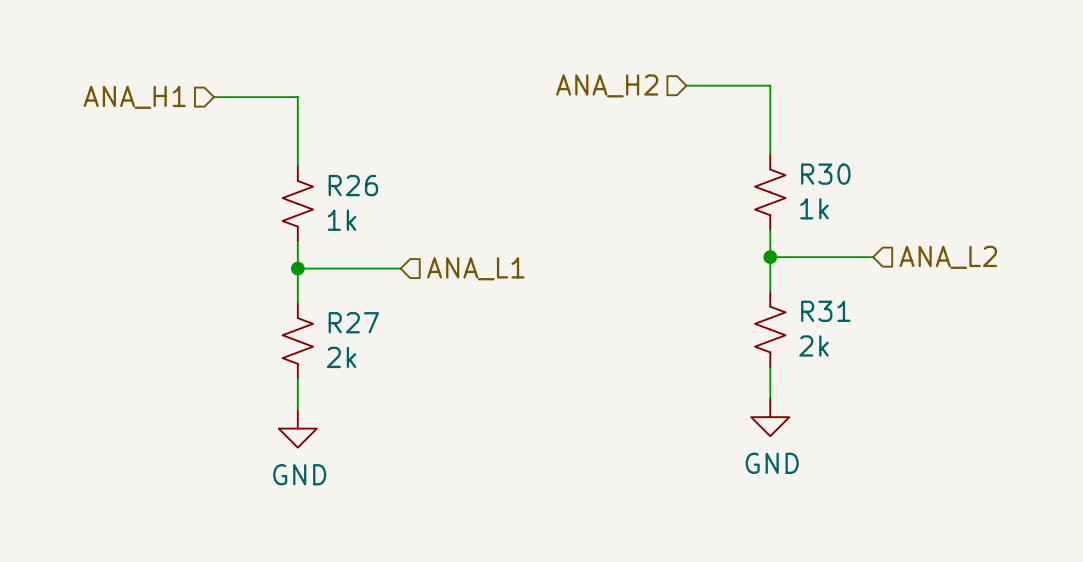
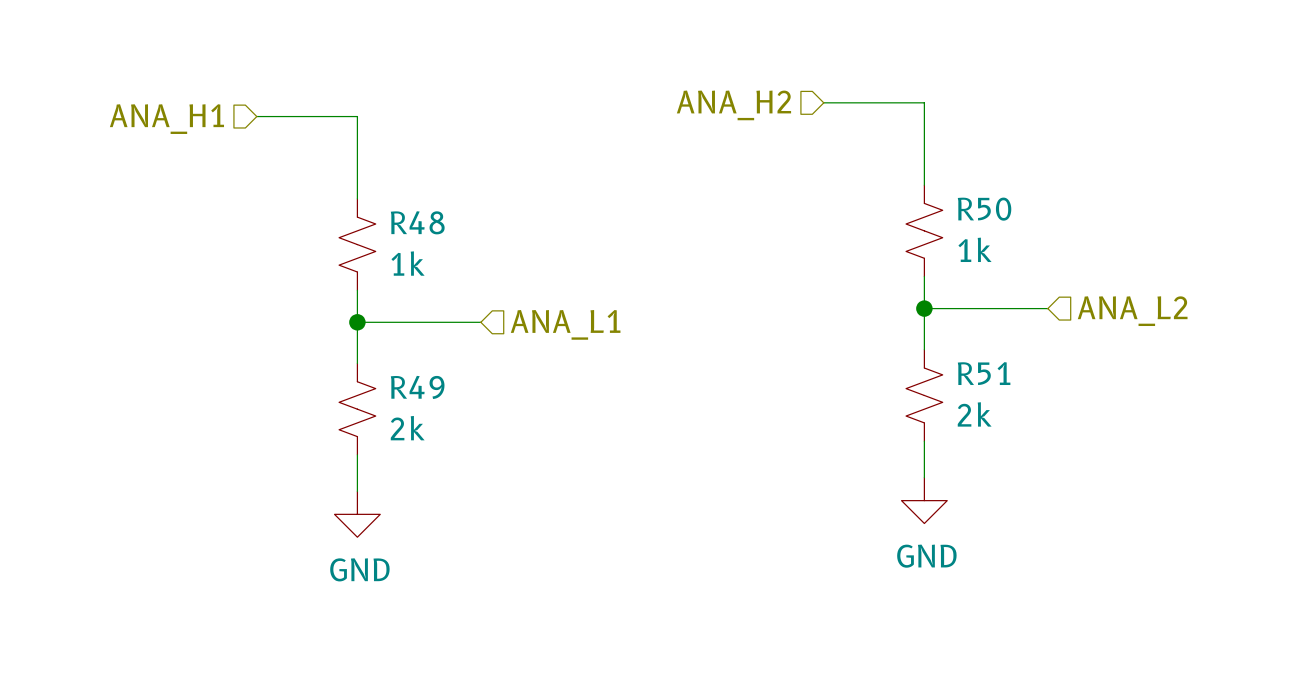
R30 name: R30 (825, 174) -> R50 (984, 209)
R26 name: R26 (353, 185) -> R48 (417, 222)
R31 name: R31 (825, 311) -> R51 (984, 373)
R27 name: R27 (353, 322) -> R49 (417, 387)

